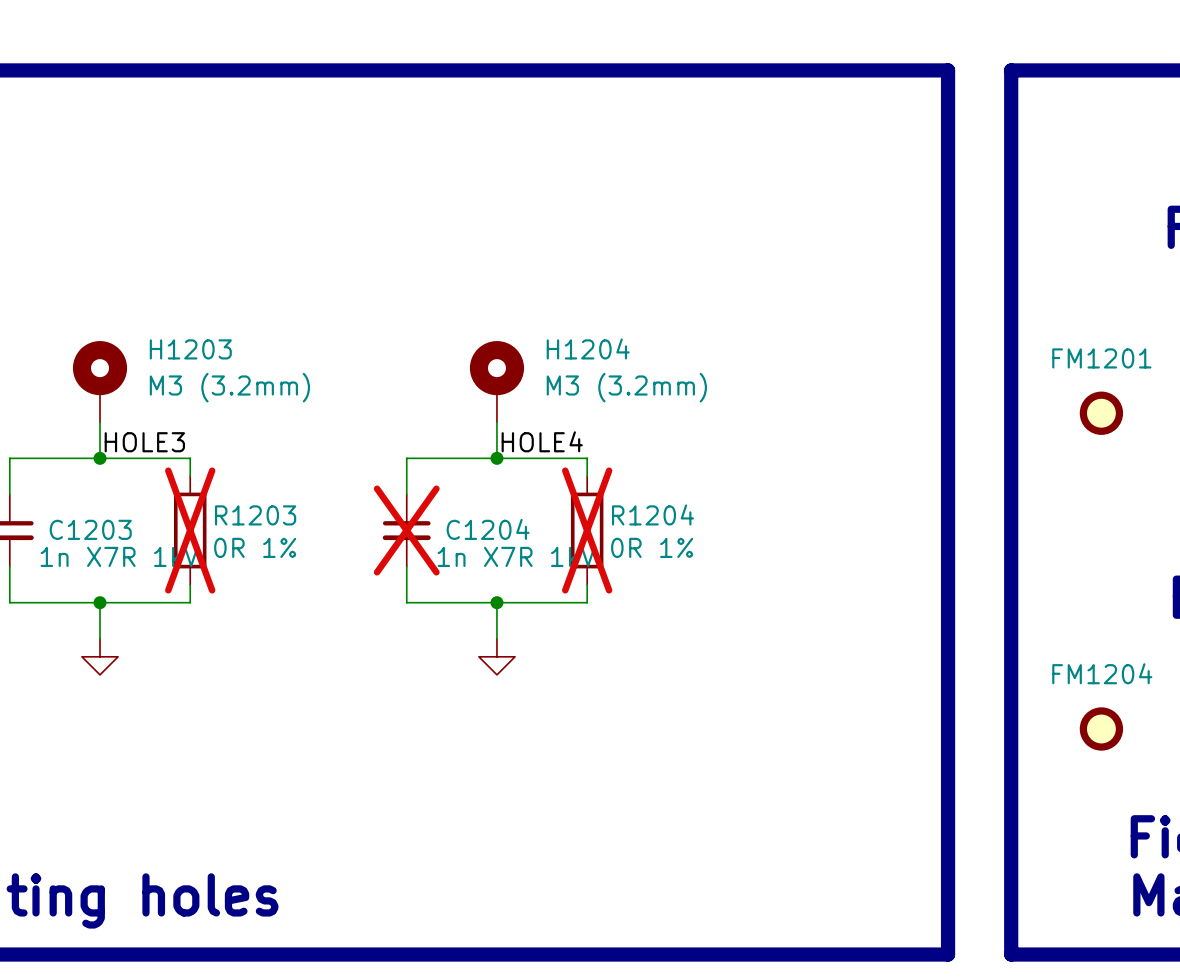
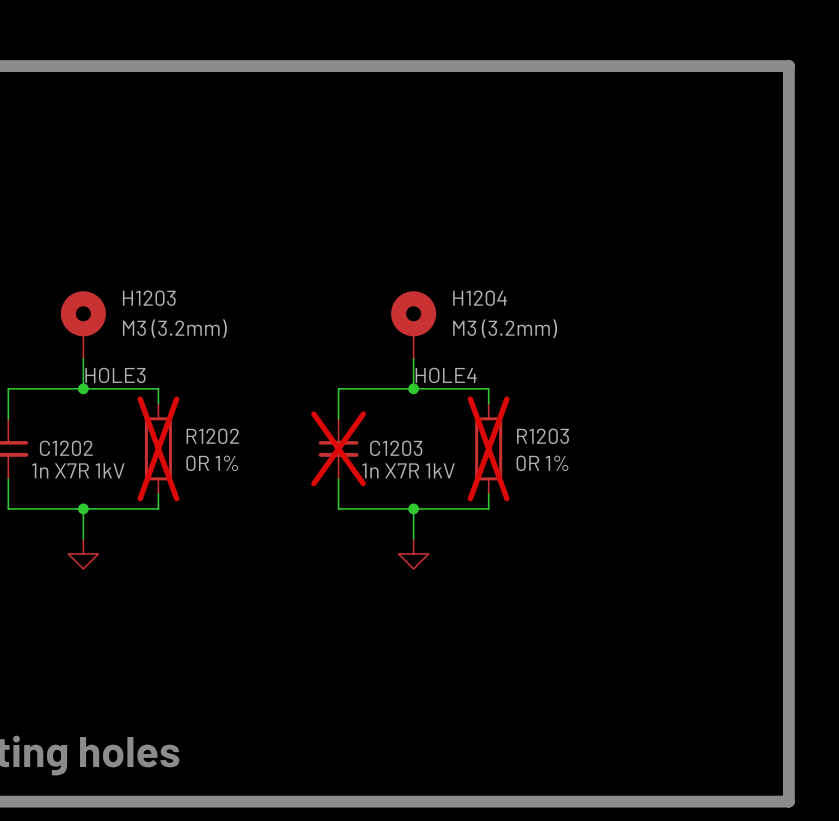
R1204 name: R1204 (653, 514) -> R1203 (543, 436)
R1203 name: R1203 (255, 515) -> R1202 (212, 436)
C1203 name: C1203 (90, 529) -> C1202 (66, 448)
C1204 name: C1204 (488, 529) -> C1203 (396, 448)

